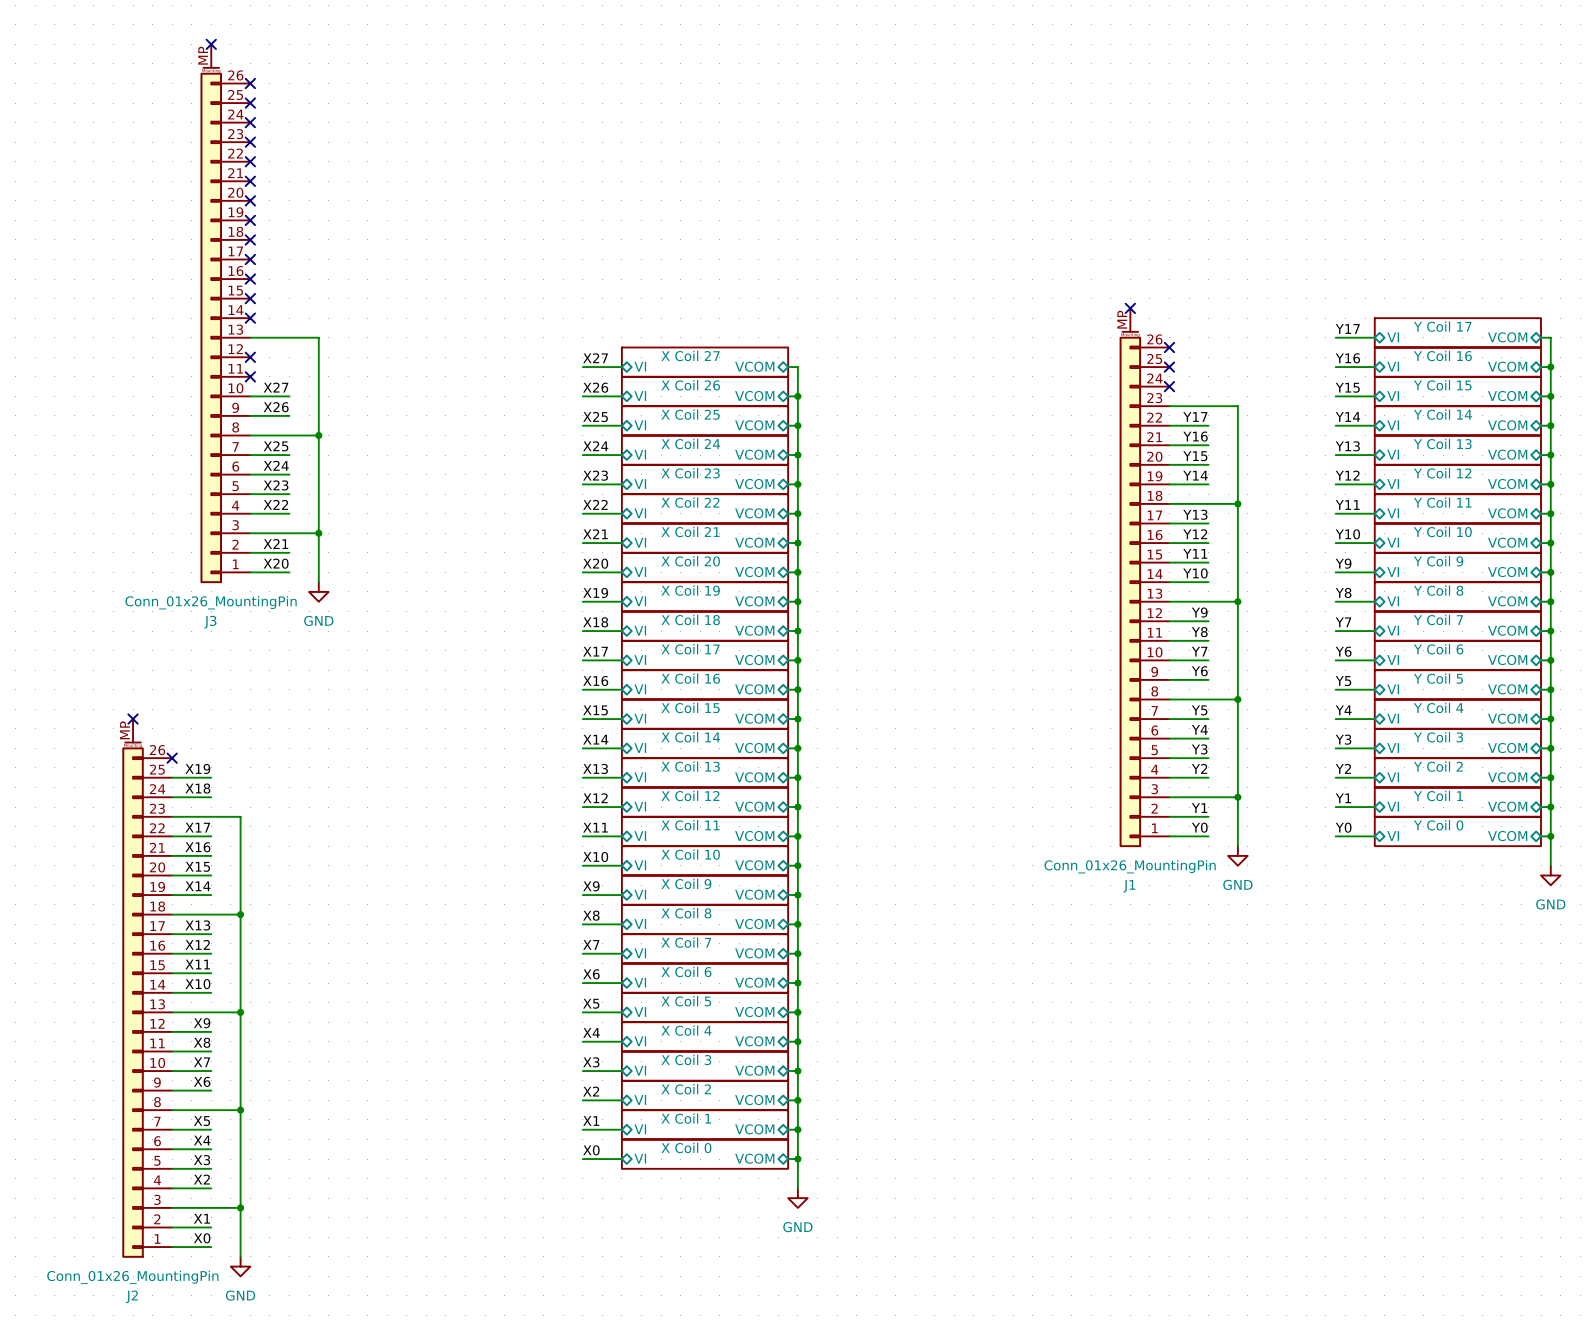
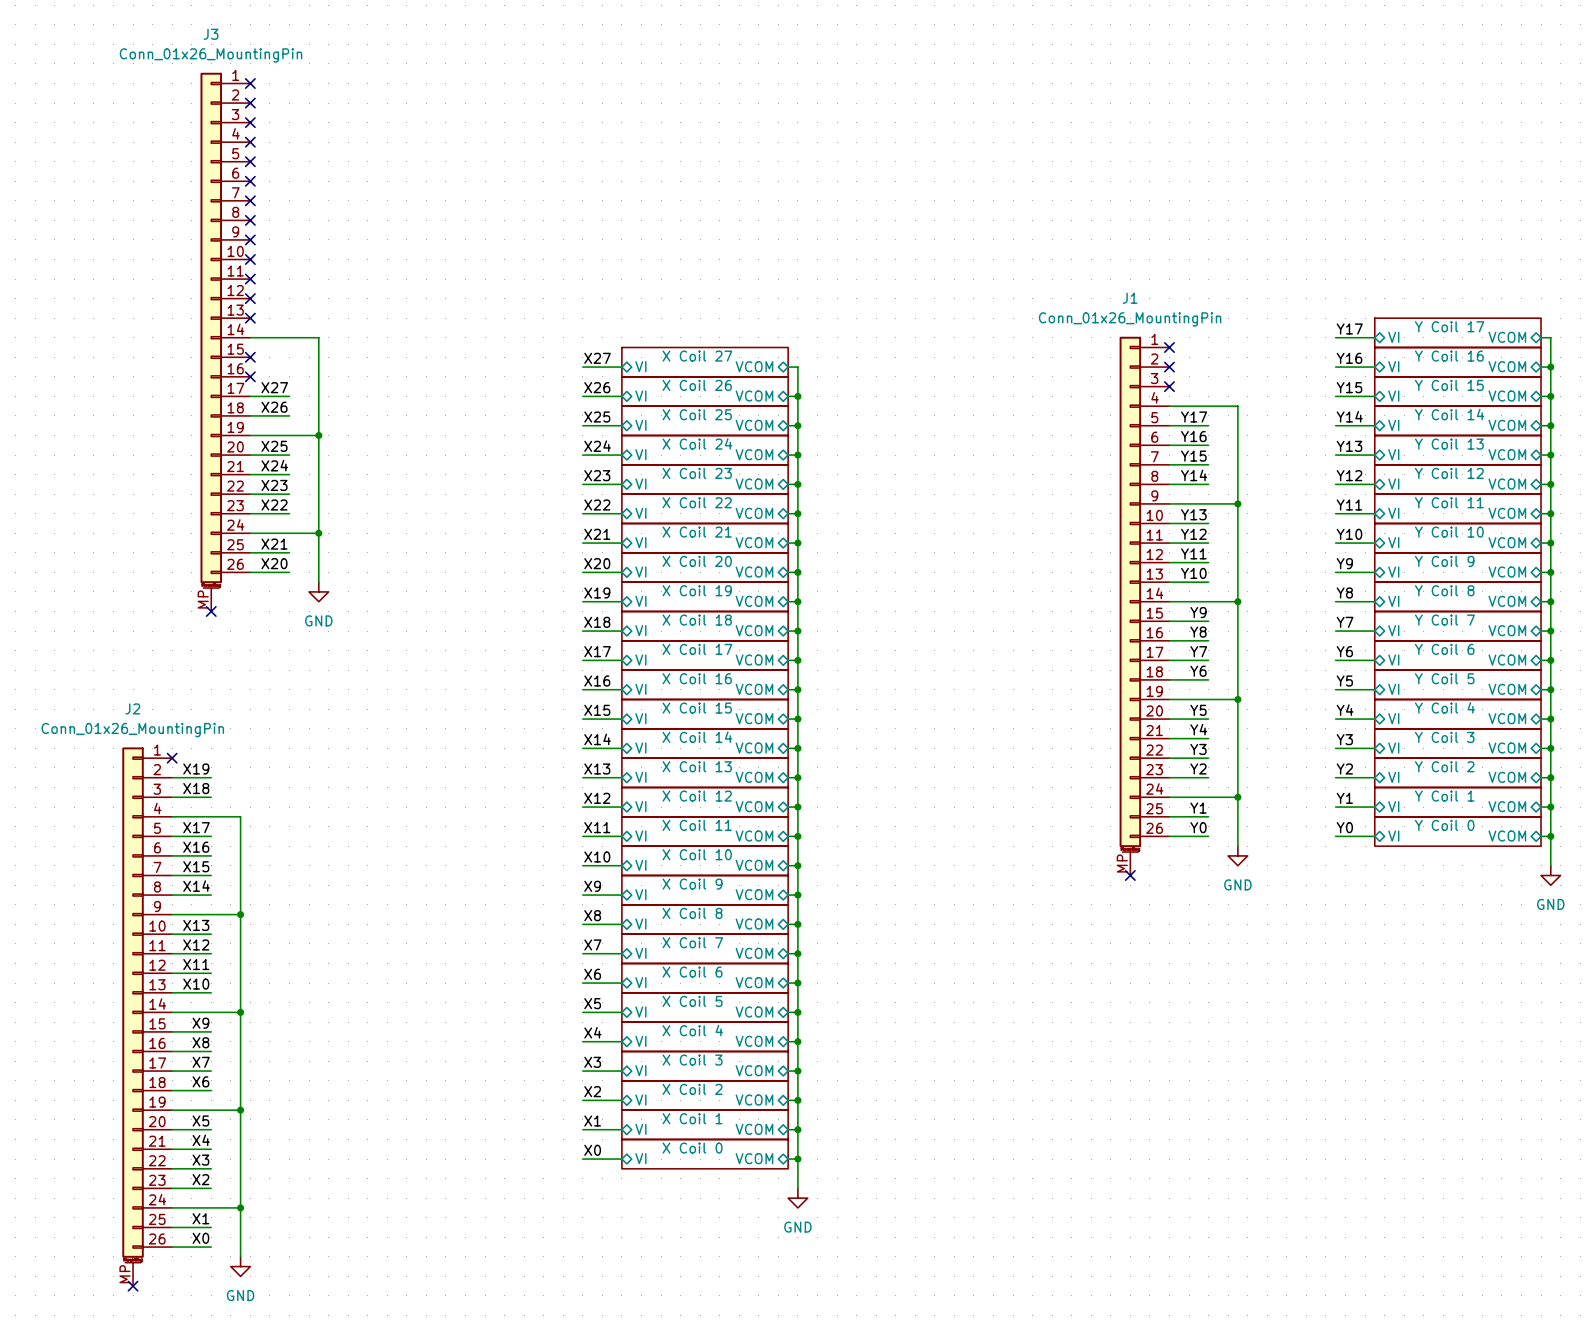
no-connect mark: (211, 44) -> none
no-connect mark: (1130, 308) -> none
J3 flip: as is (211, 325) -> up-down (211, 330)
J1 flip: as is (1130, 589) -> up-down (1130, 594)
no-connect mark: none -> (211, 611)
no-connect mark: (133, 719) -> none
no-connect mark: none -> (1130, 875)
J2 flip: as is (133, 999) -> up-down (133, 1005)
no-connect mark: none -> (133, 1286)

